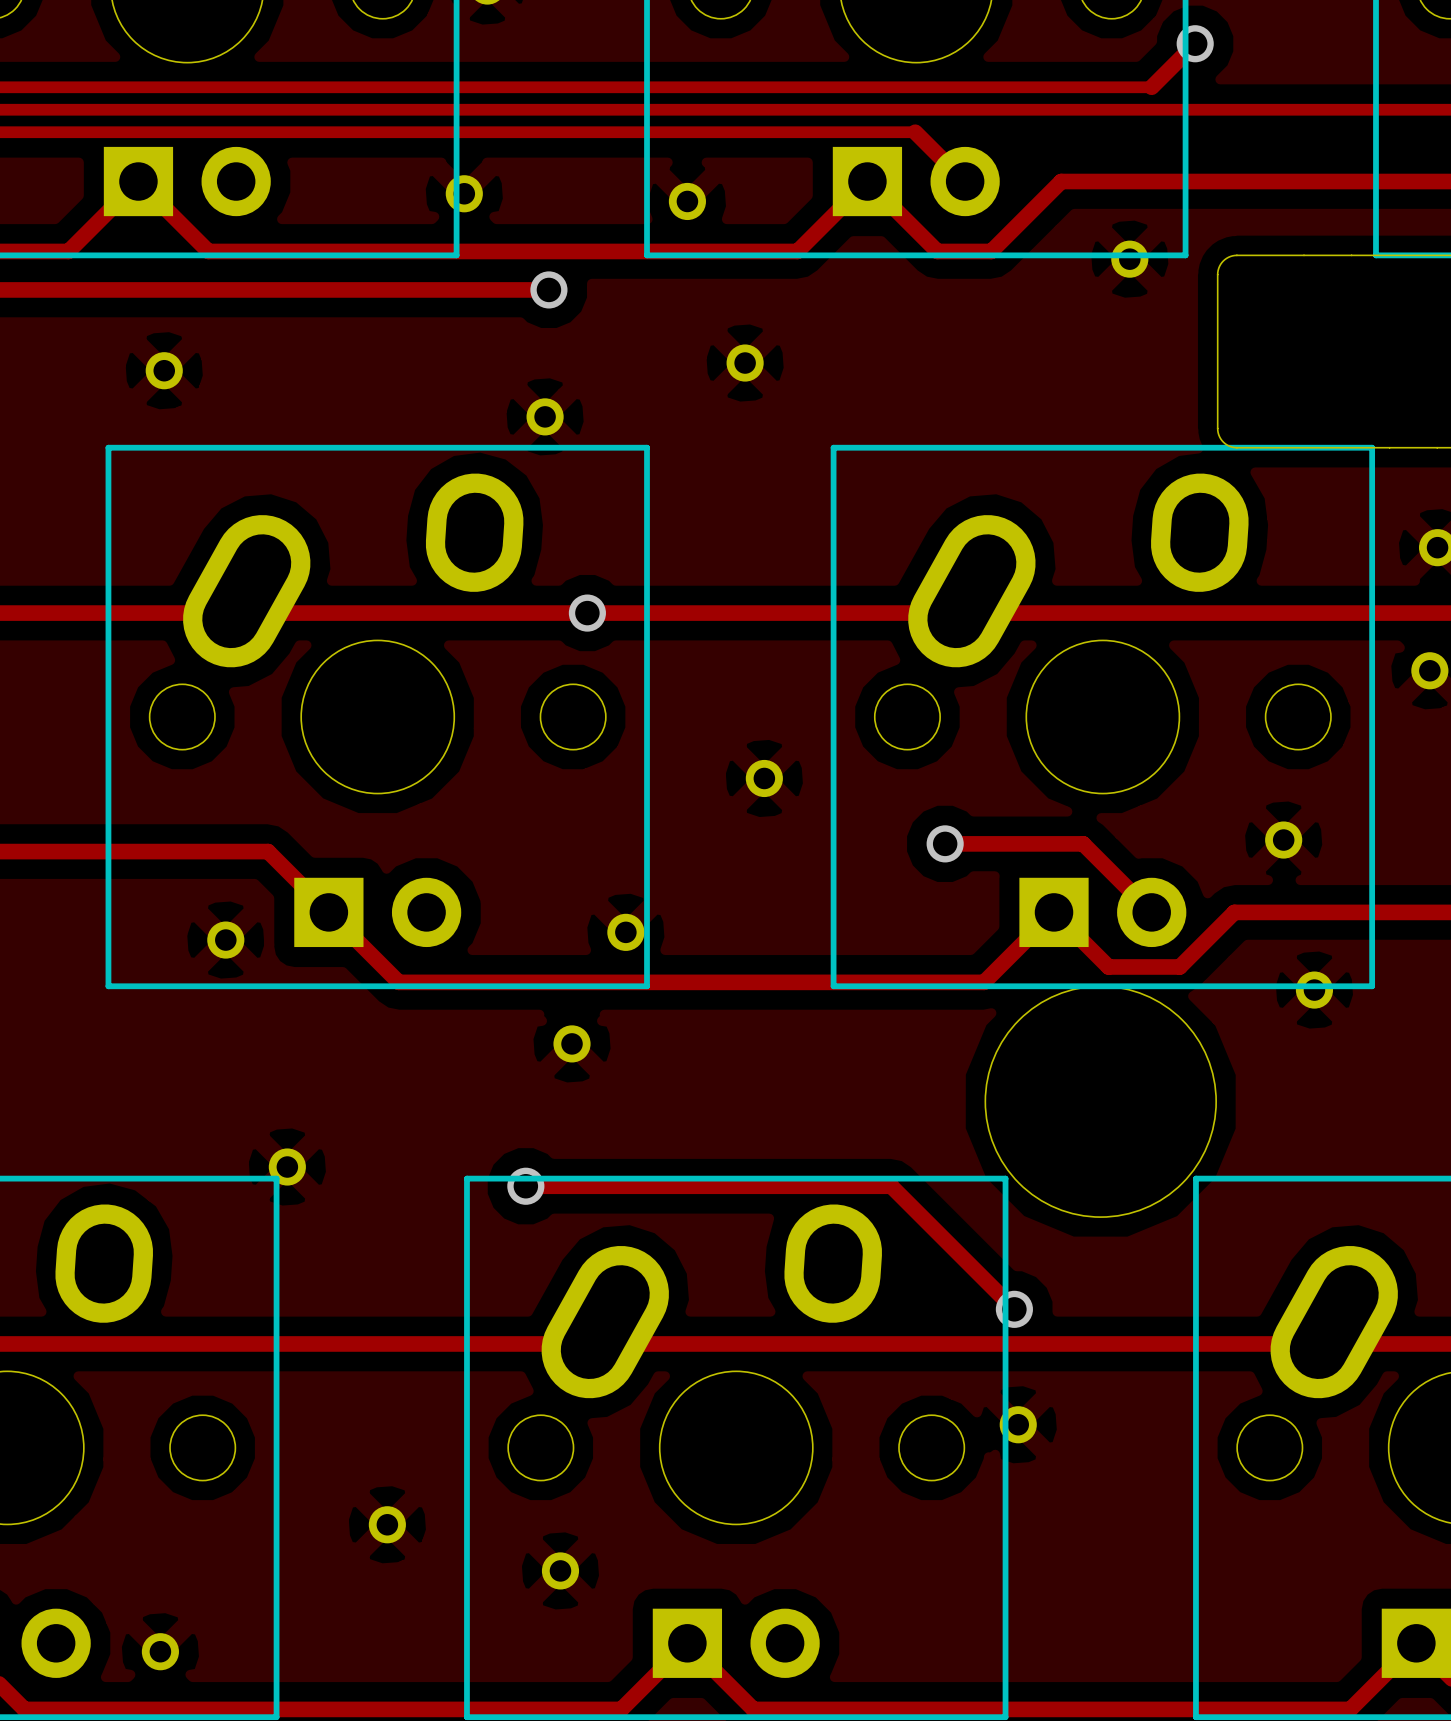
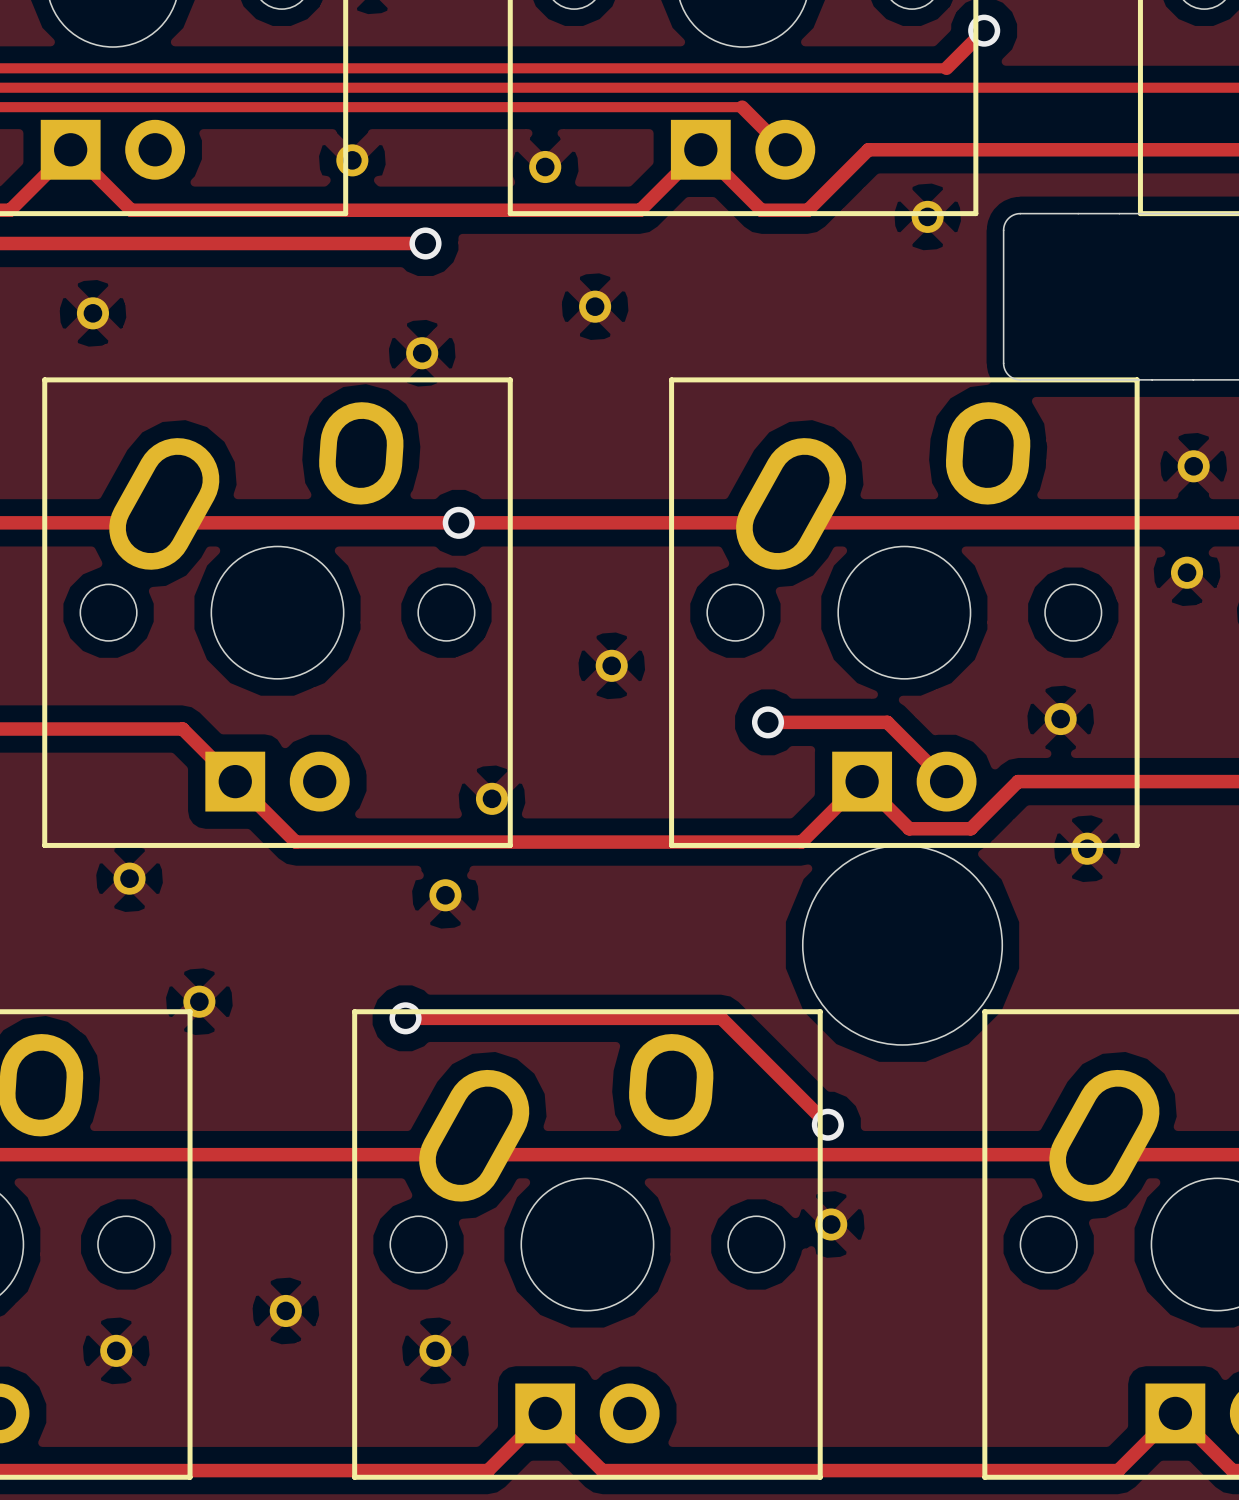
part position: (225, 940) -> (129, 878)
part position: (160, 1651) -> (116, 1350)

